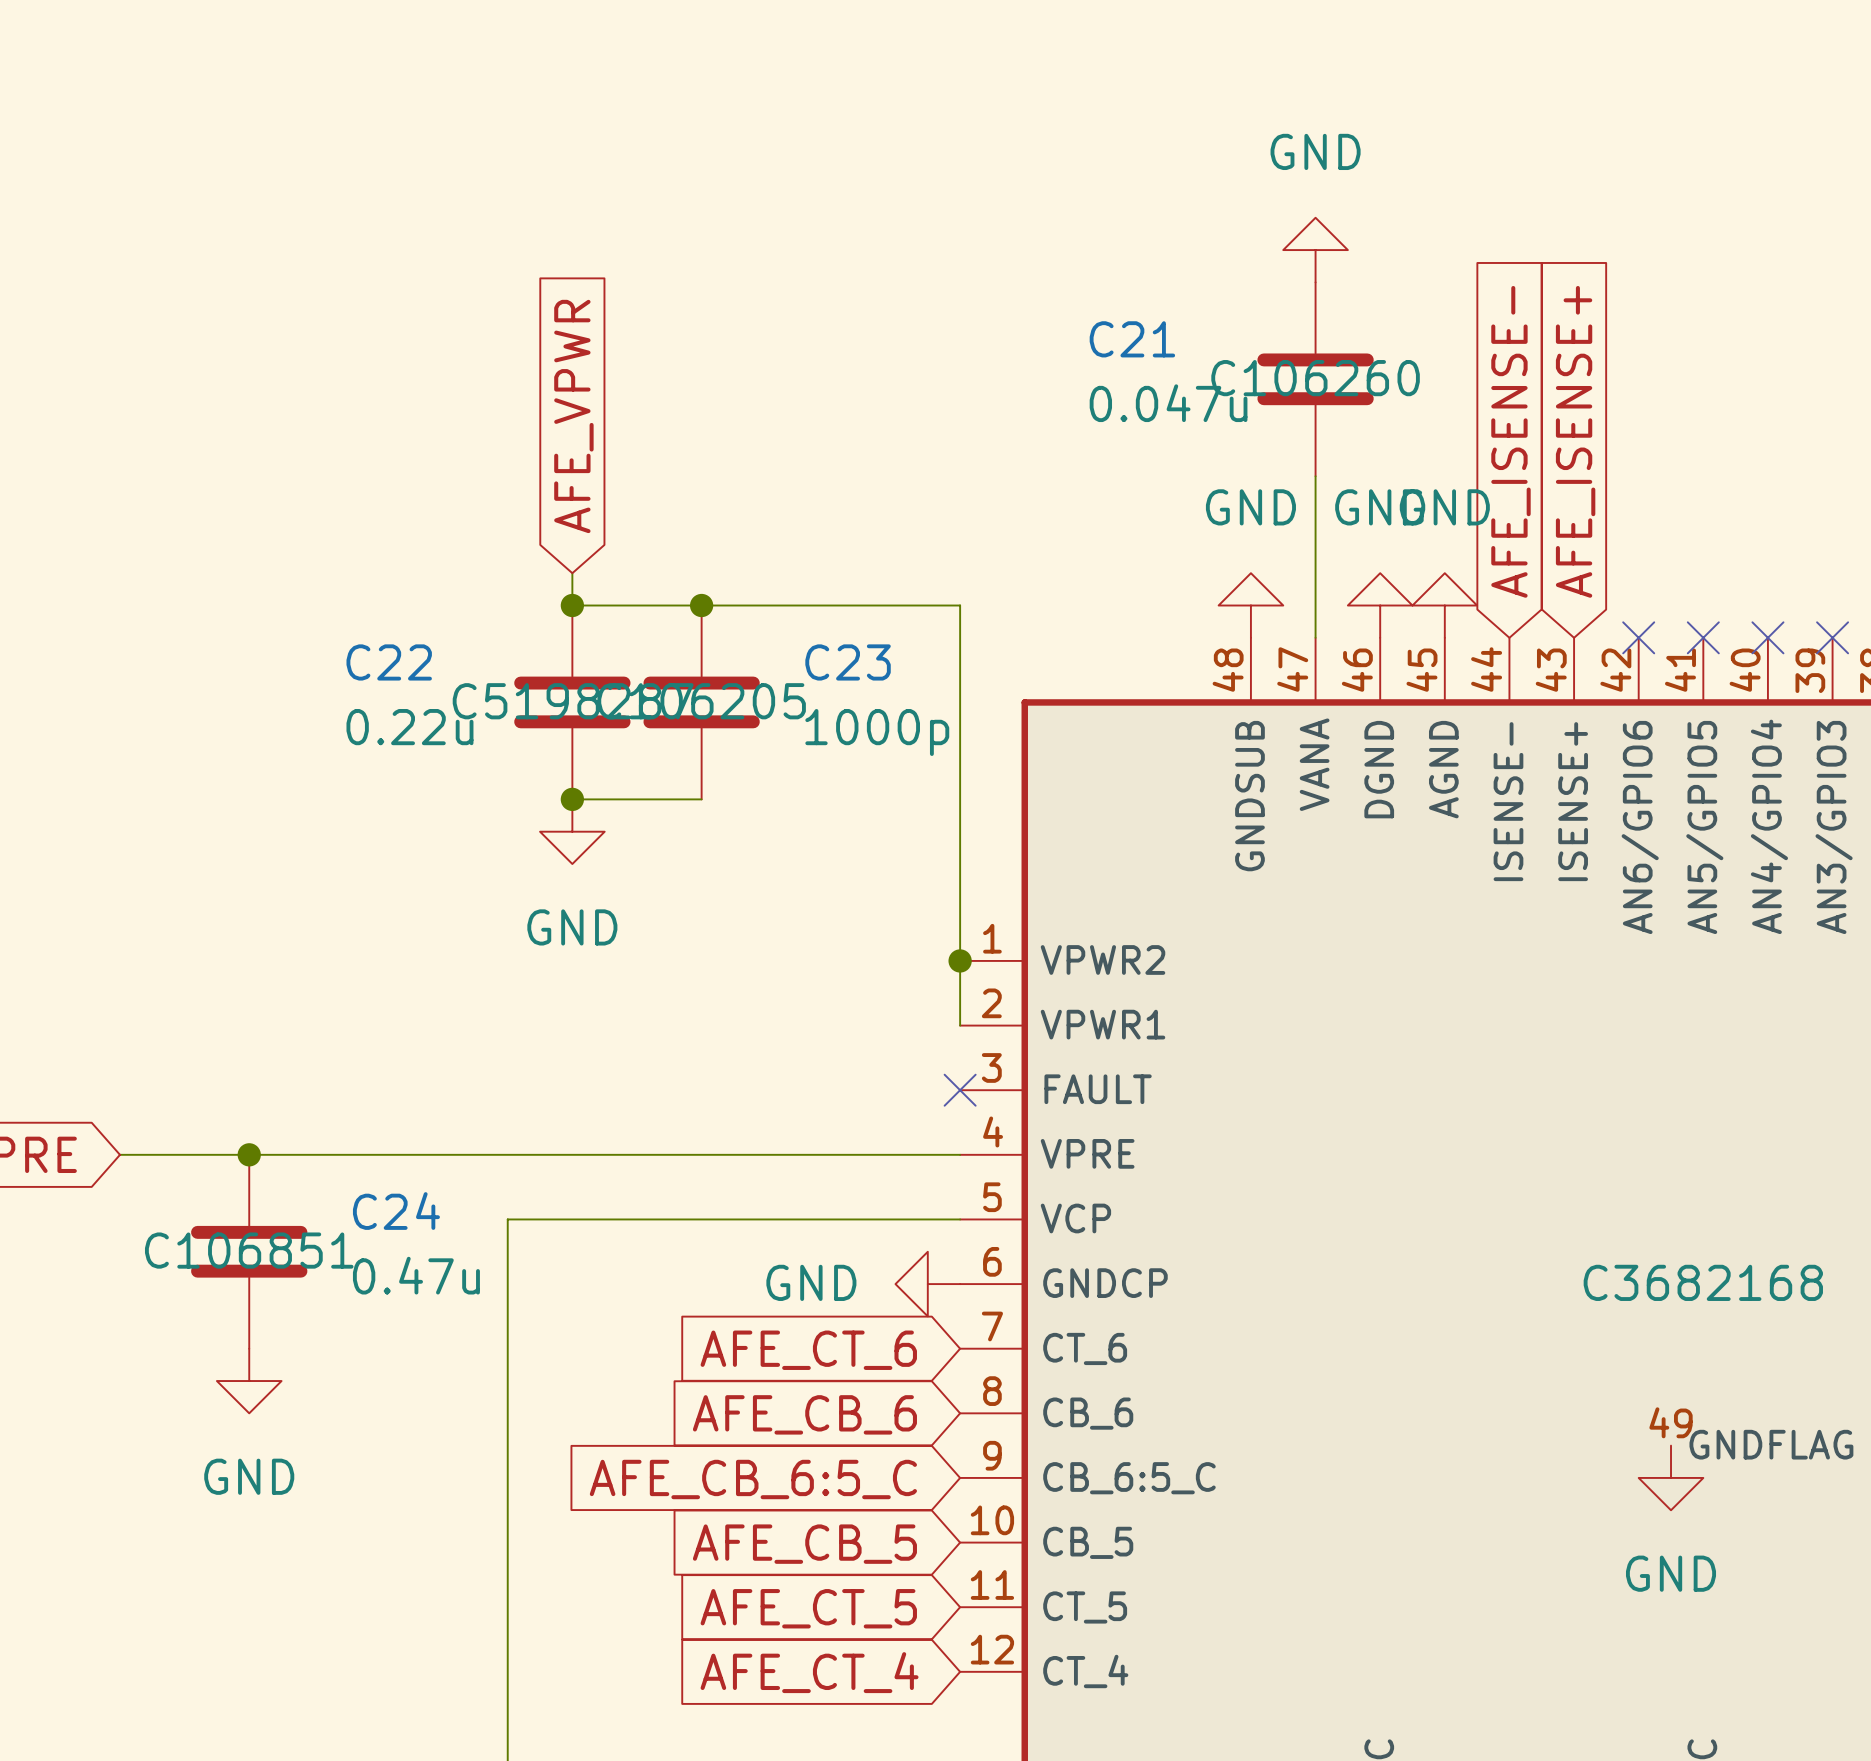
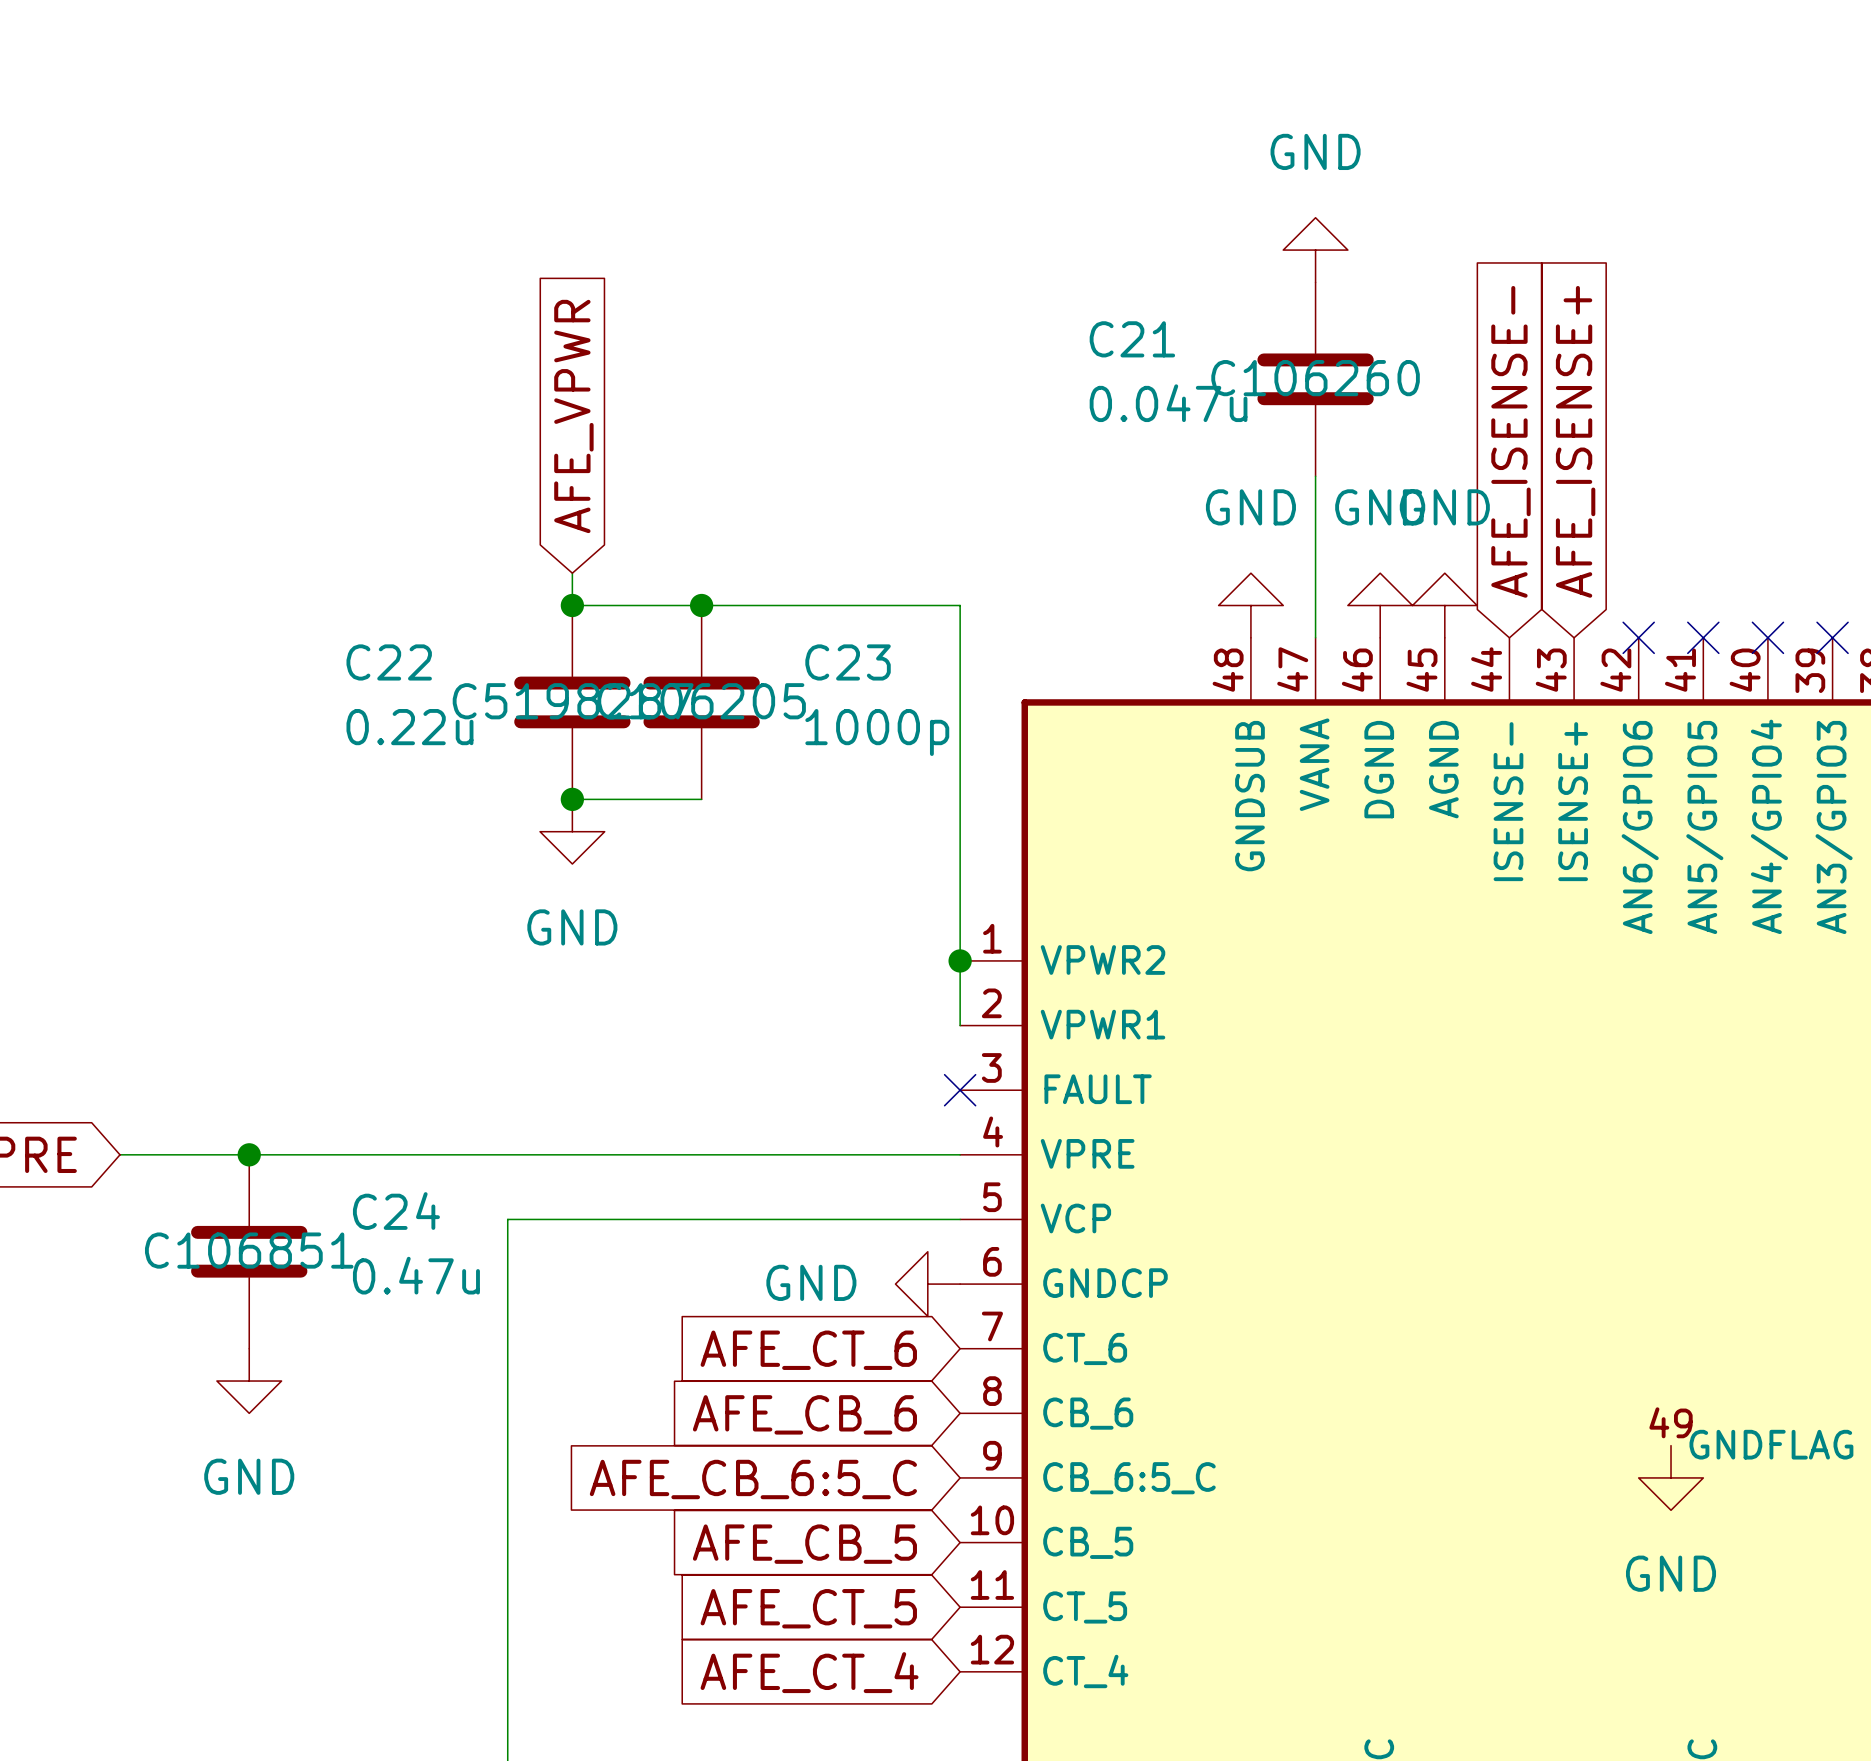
part text: C3682168 (1703, 1282) -> none

